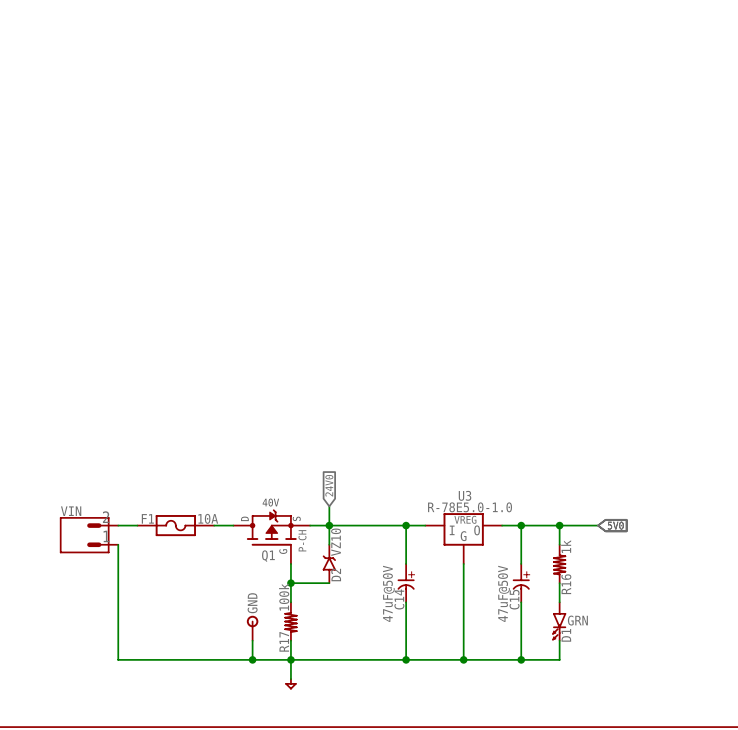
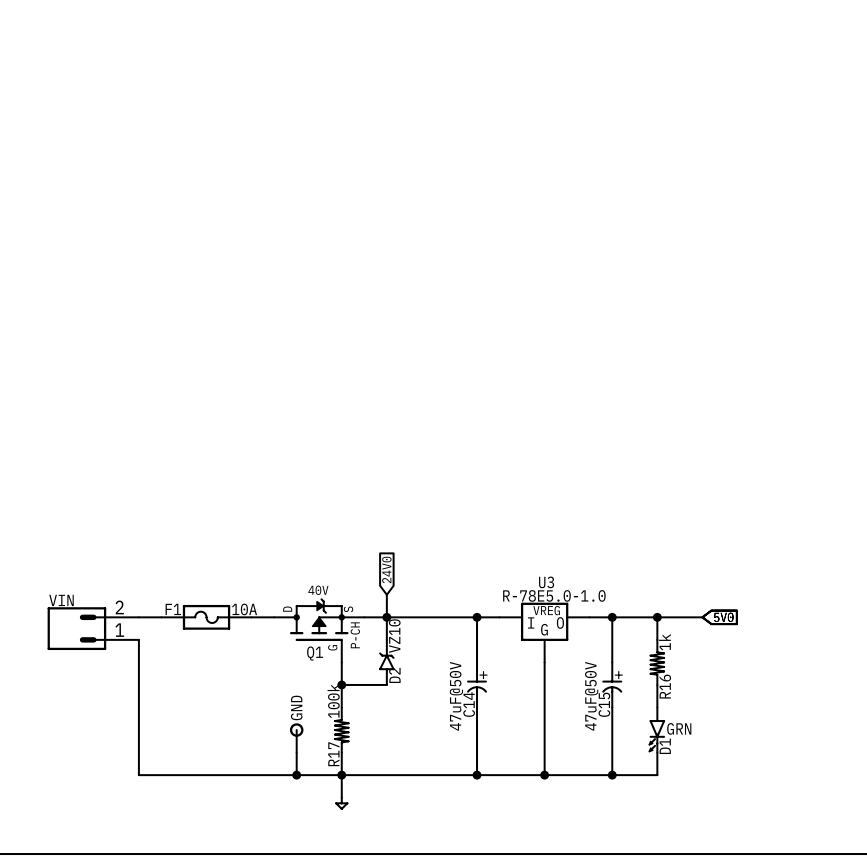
VIN: none -> (93, 628)
VIN: (89, 535) -> none

